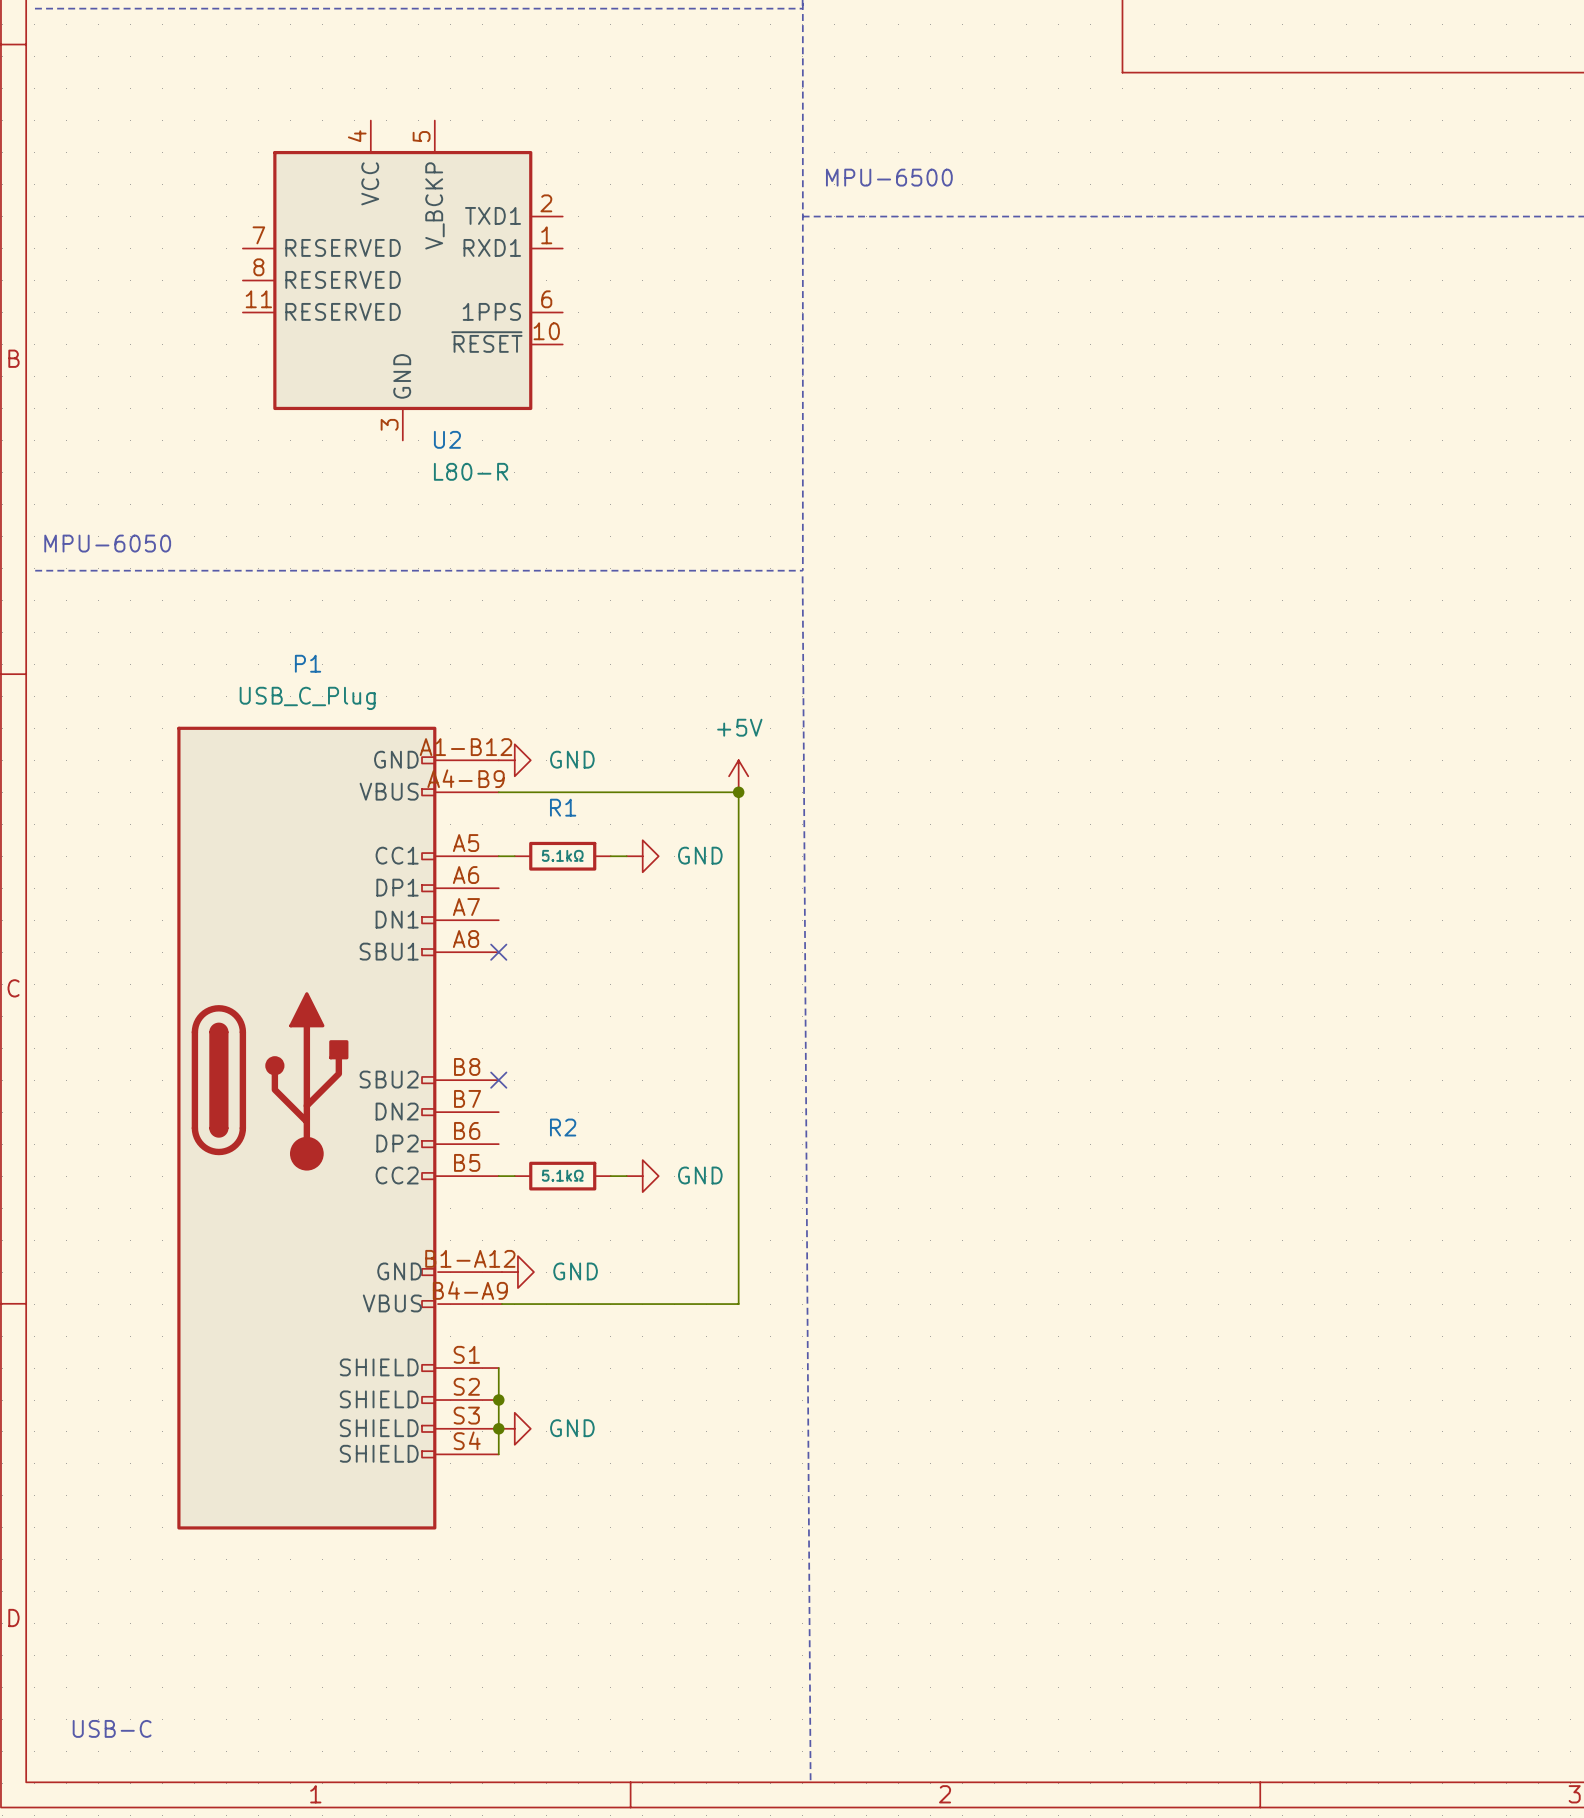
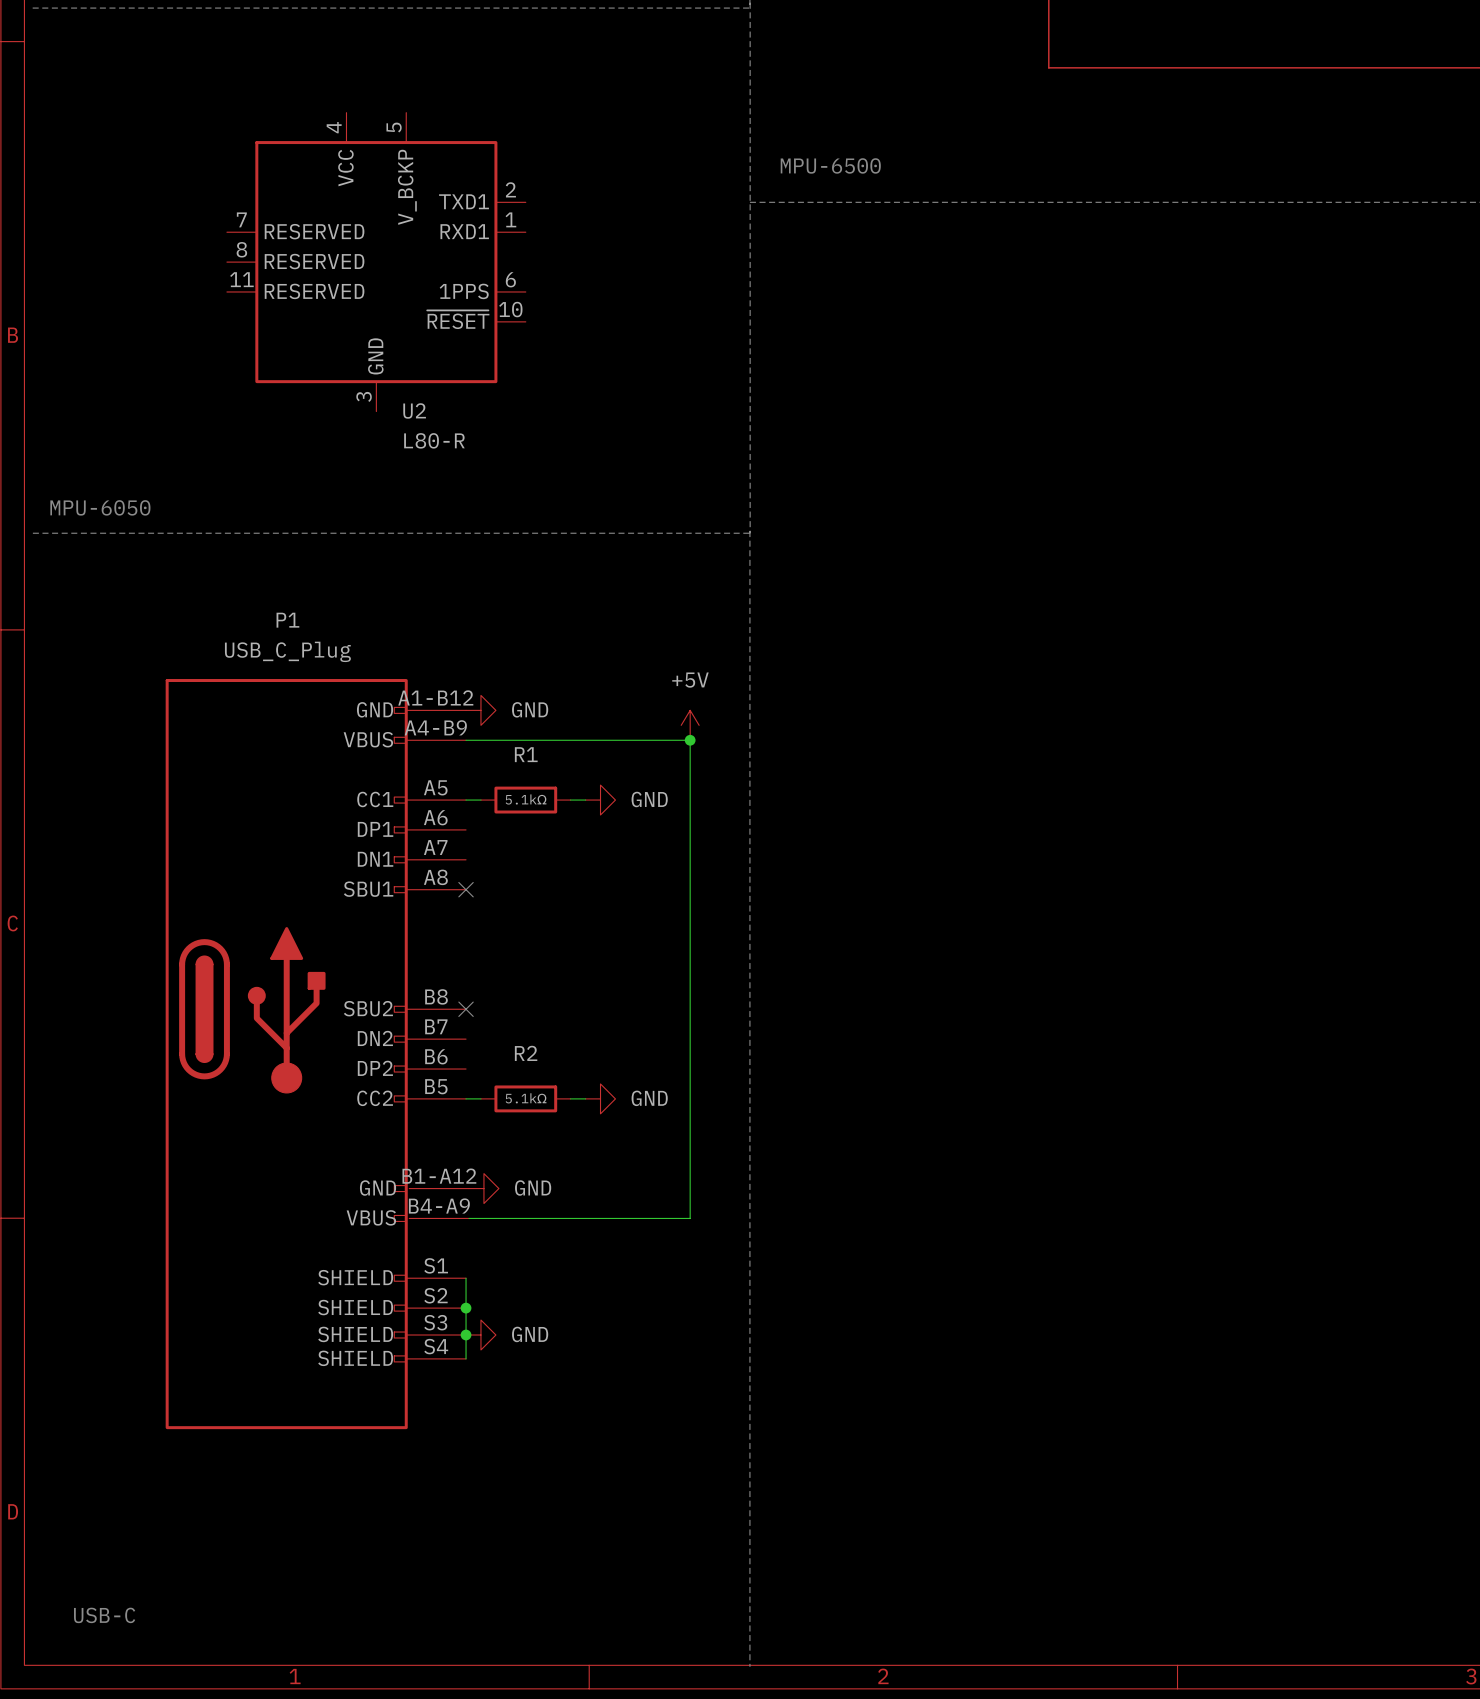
line: none -> (749, 531) (749, 1666)
line: (802, 576) (810, 1783) -> none

